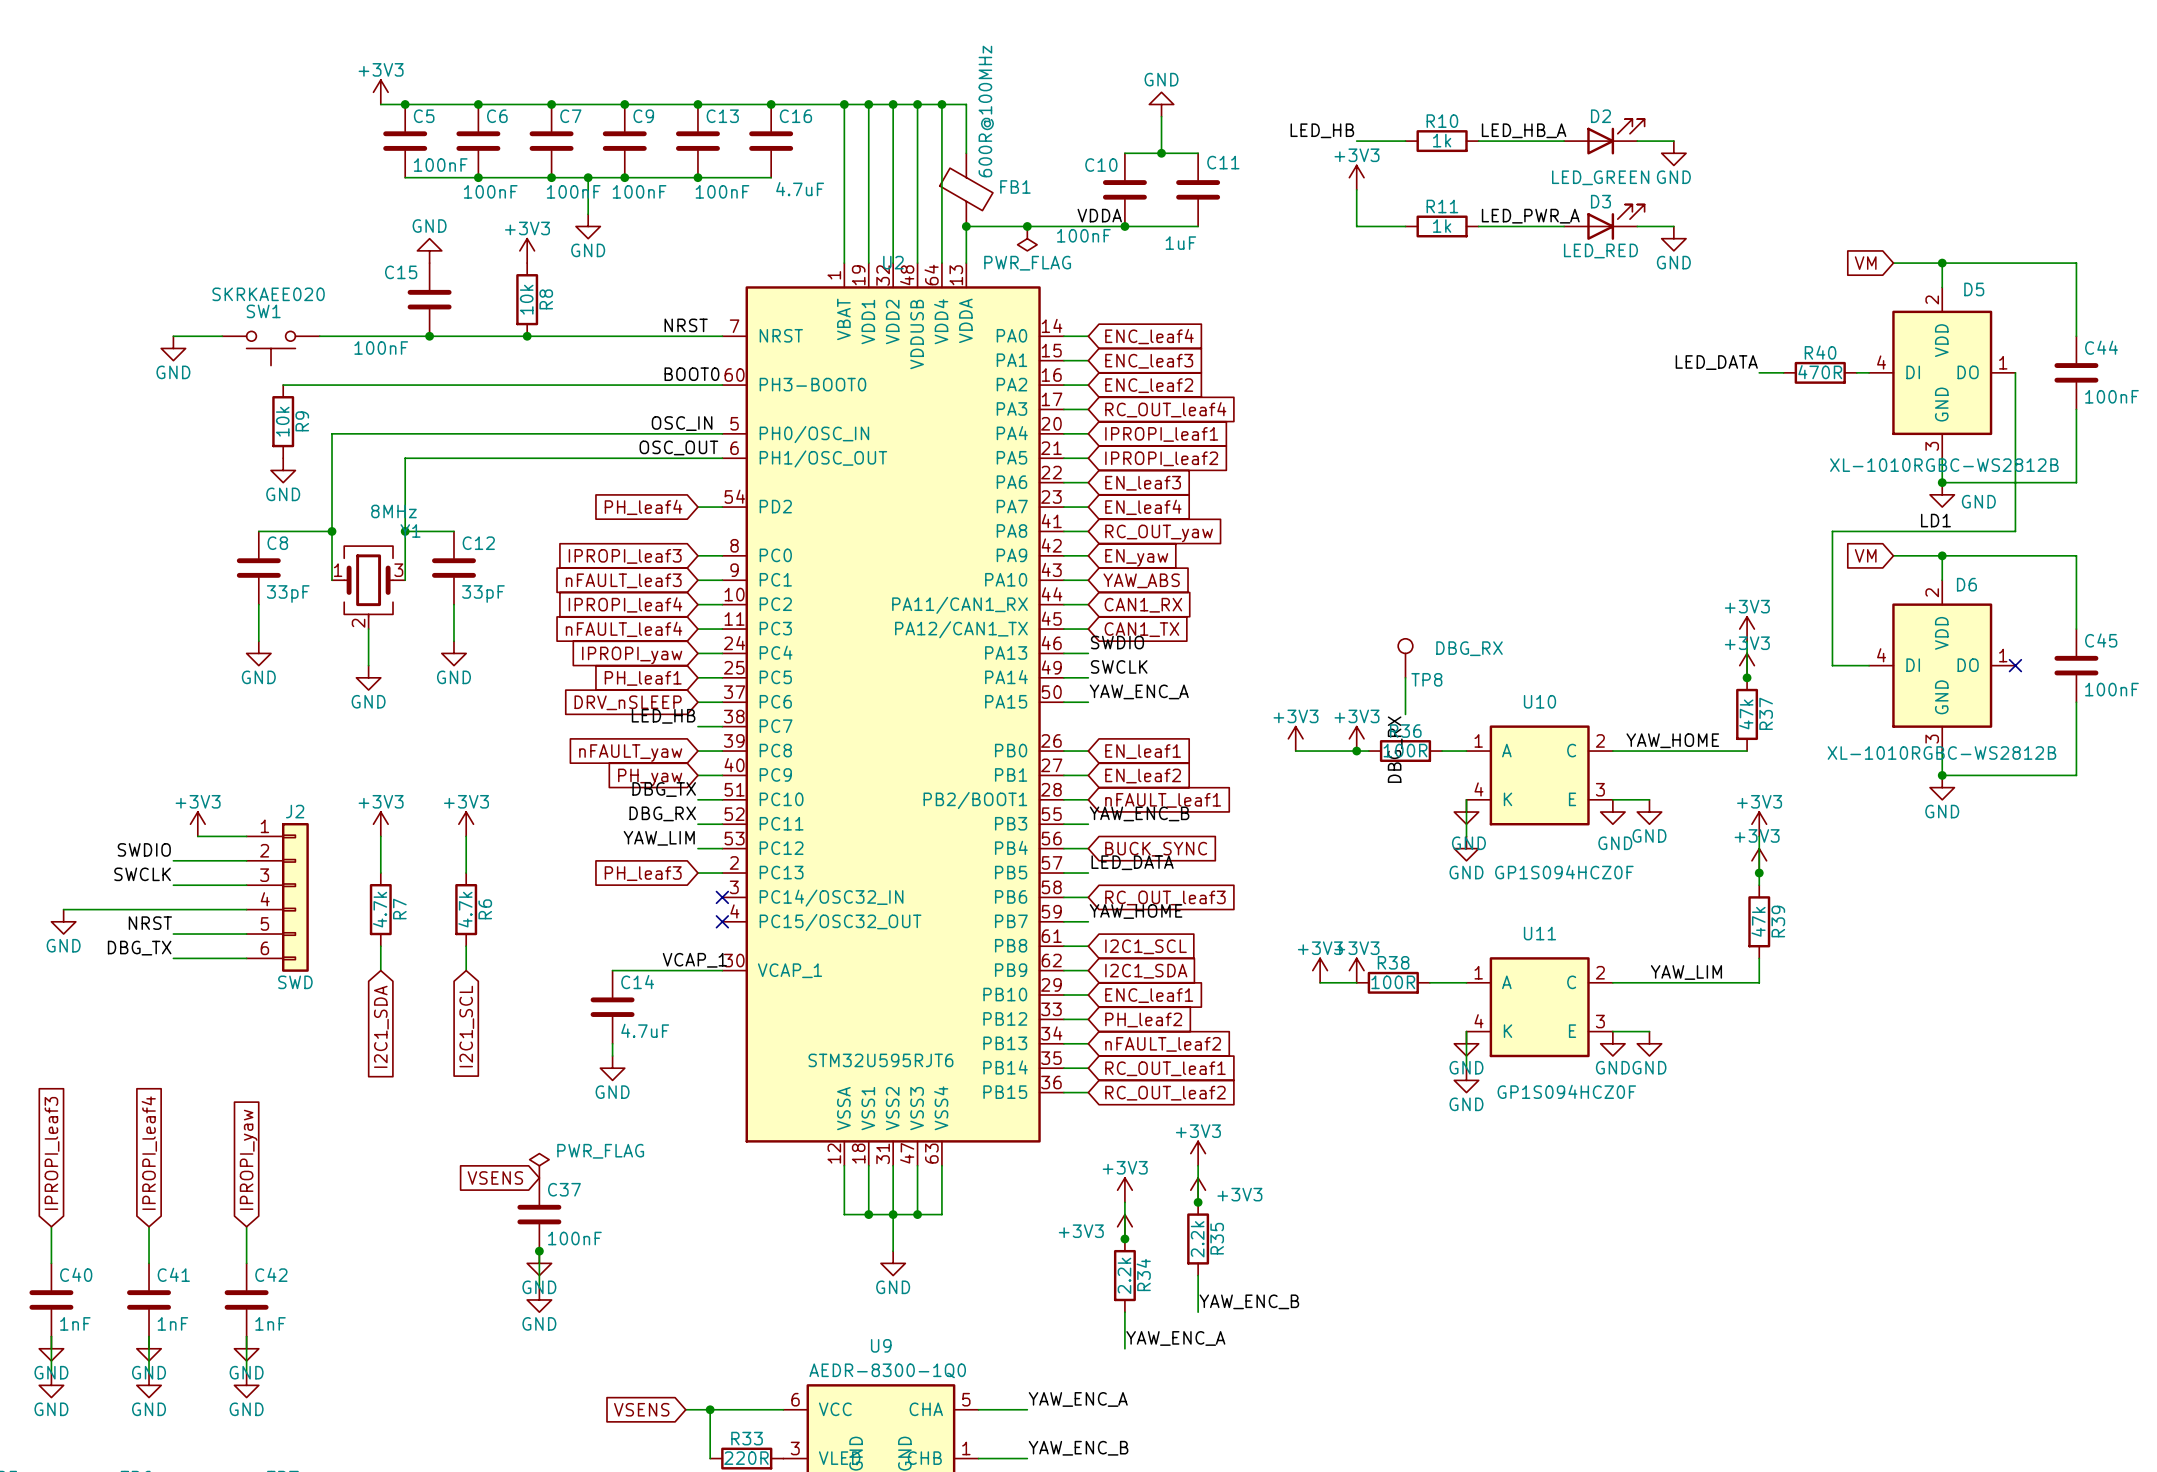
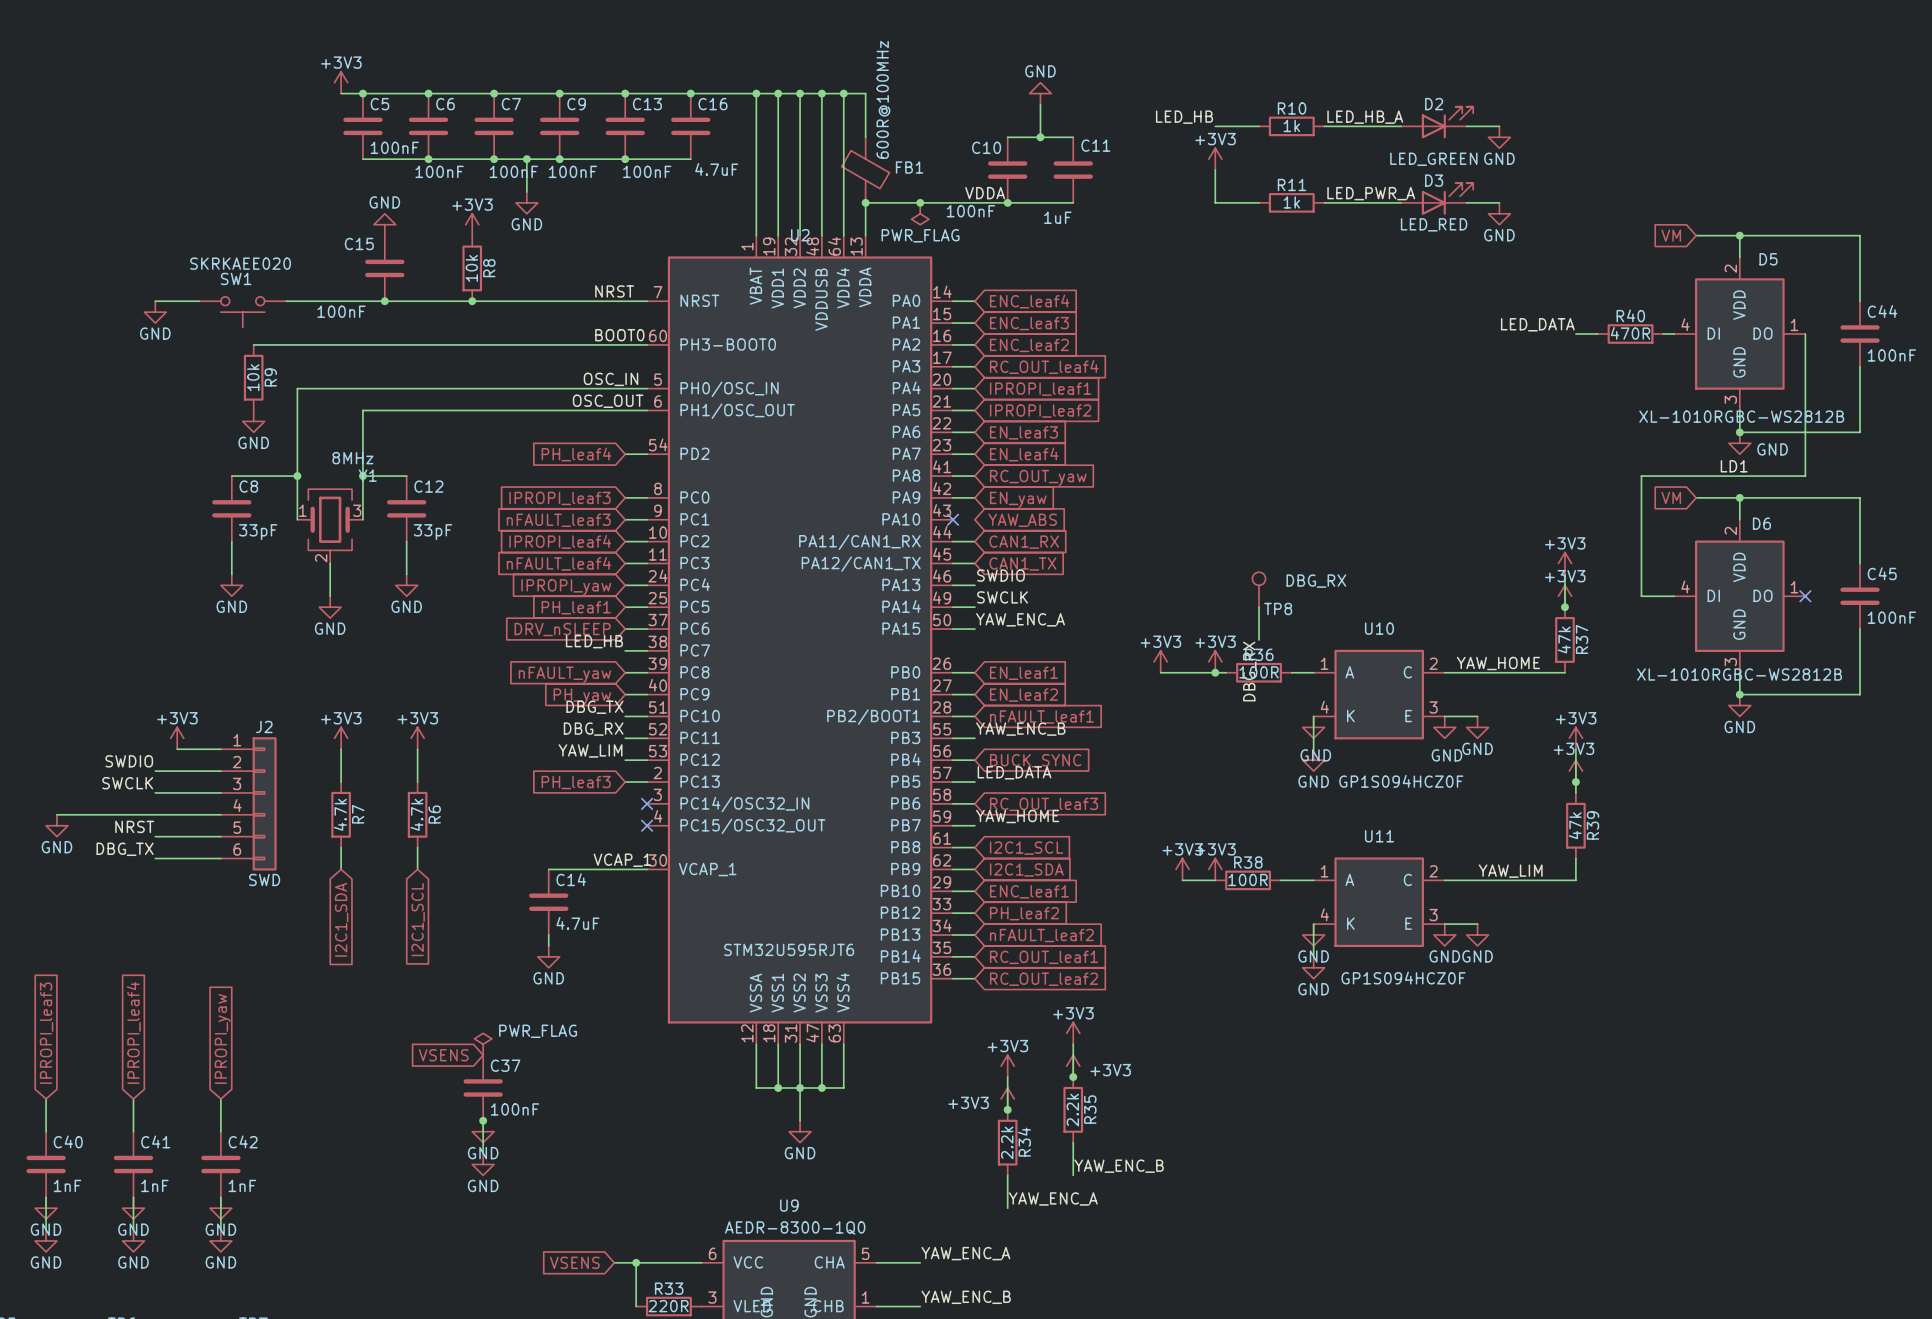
wire: (1063, 580) (1088, 580) -> none
no-connect mark: none -> (953, 519)

